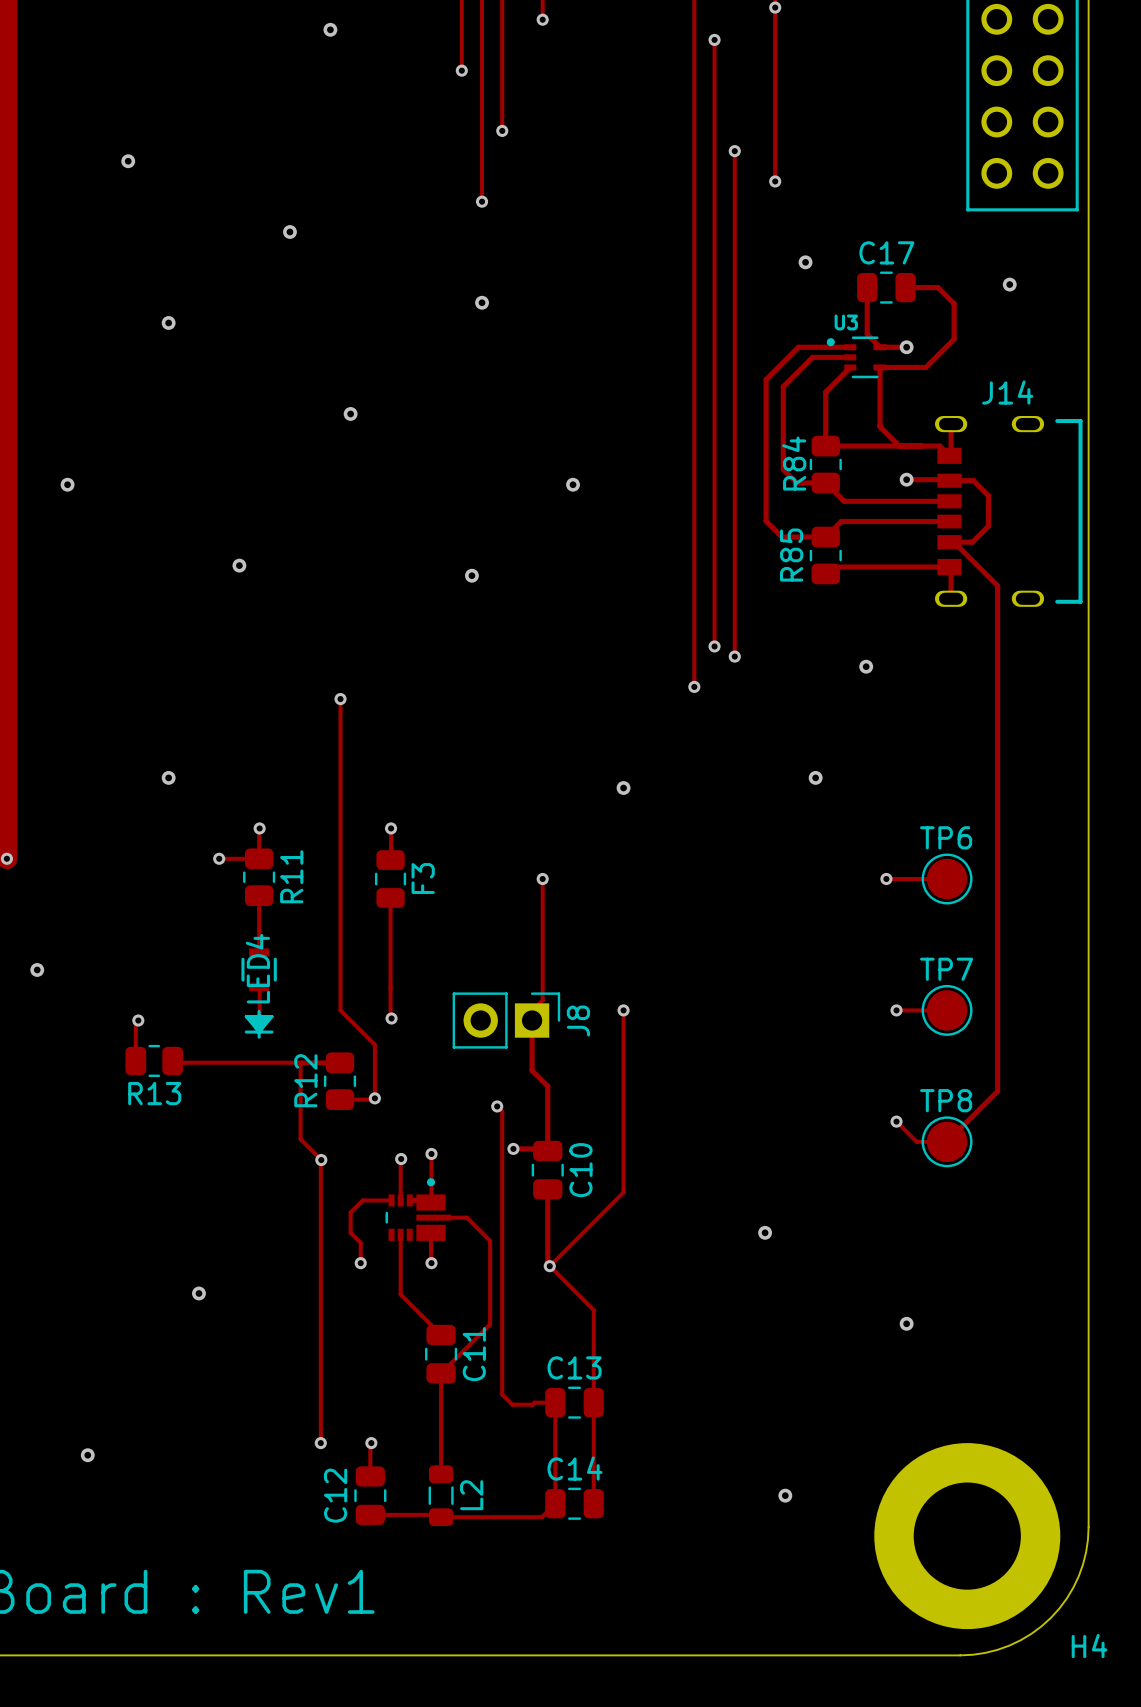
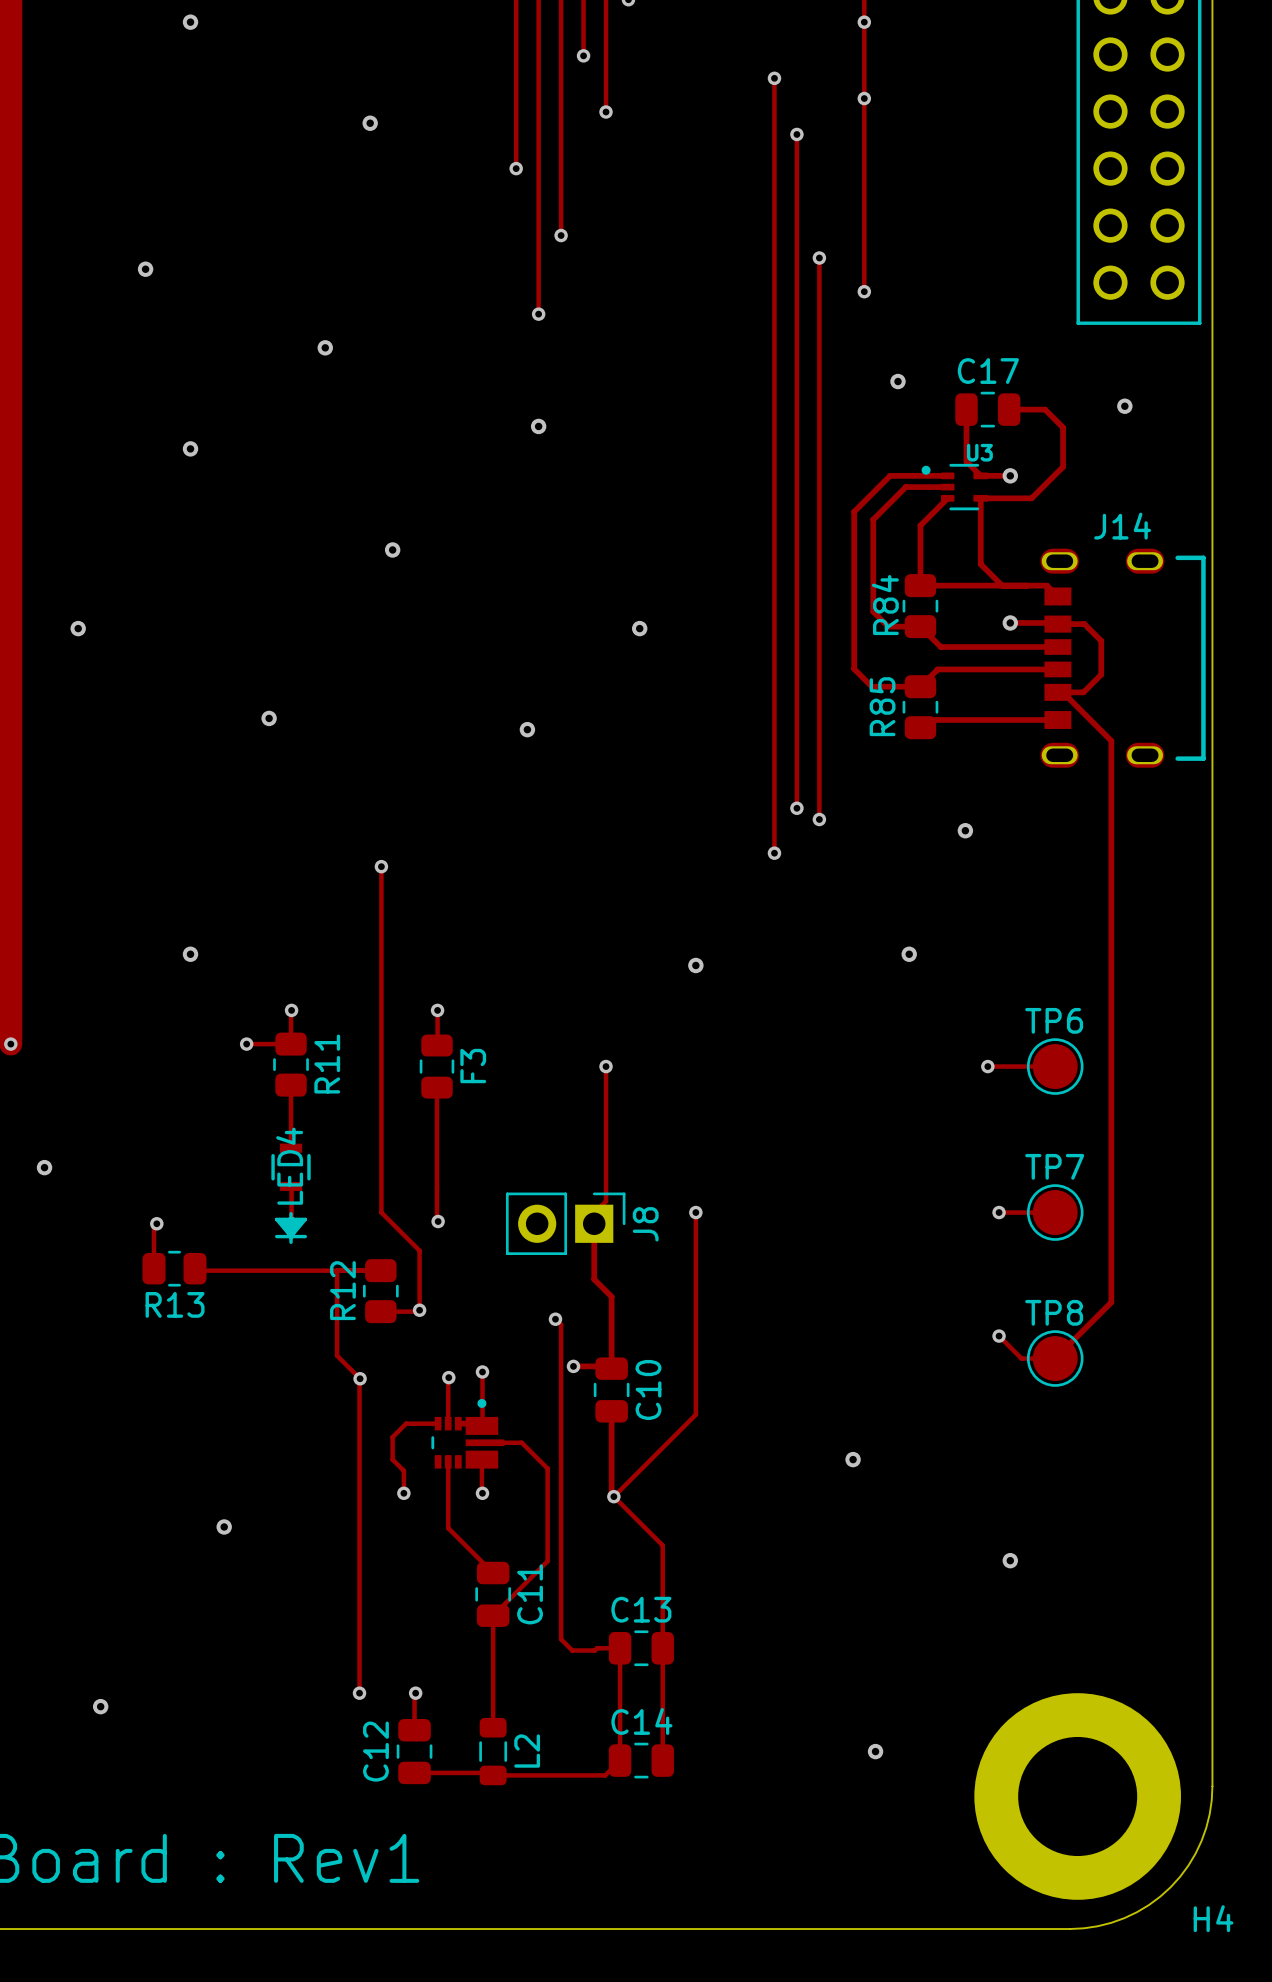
U3 name position: U3 (846, 322) -> U3 (979, 452)
J14 footprint: [934, 415, 1083, 607] -> [1040, 548, 1206, 768]
track: (951, 424) (951, 454) (949, 455) -> none
track: (949, 567) (951, 568) (951, 598) -> none

